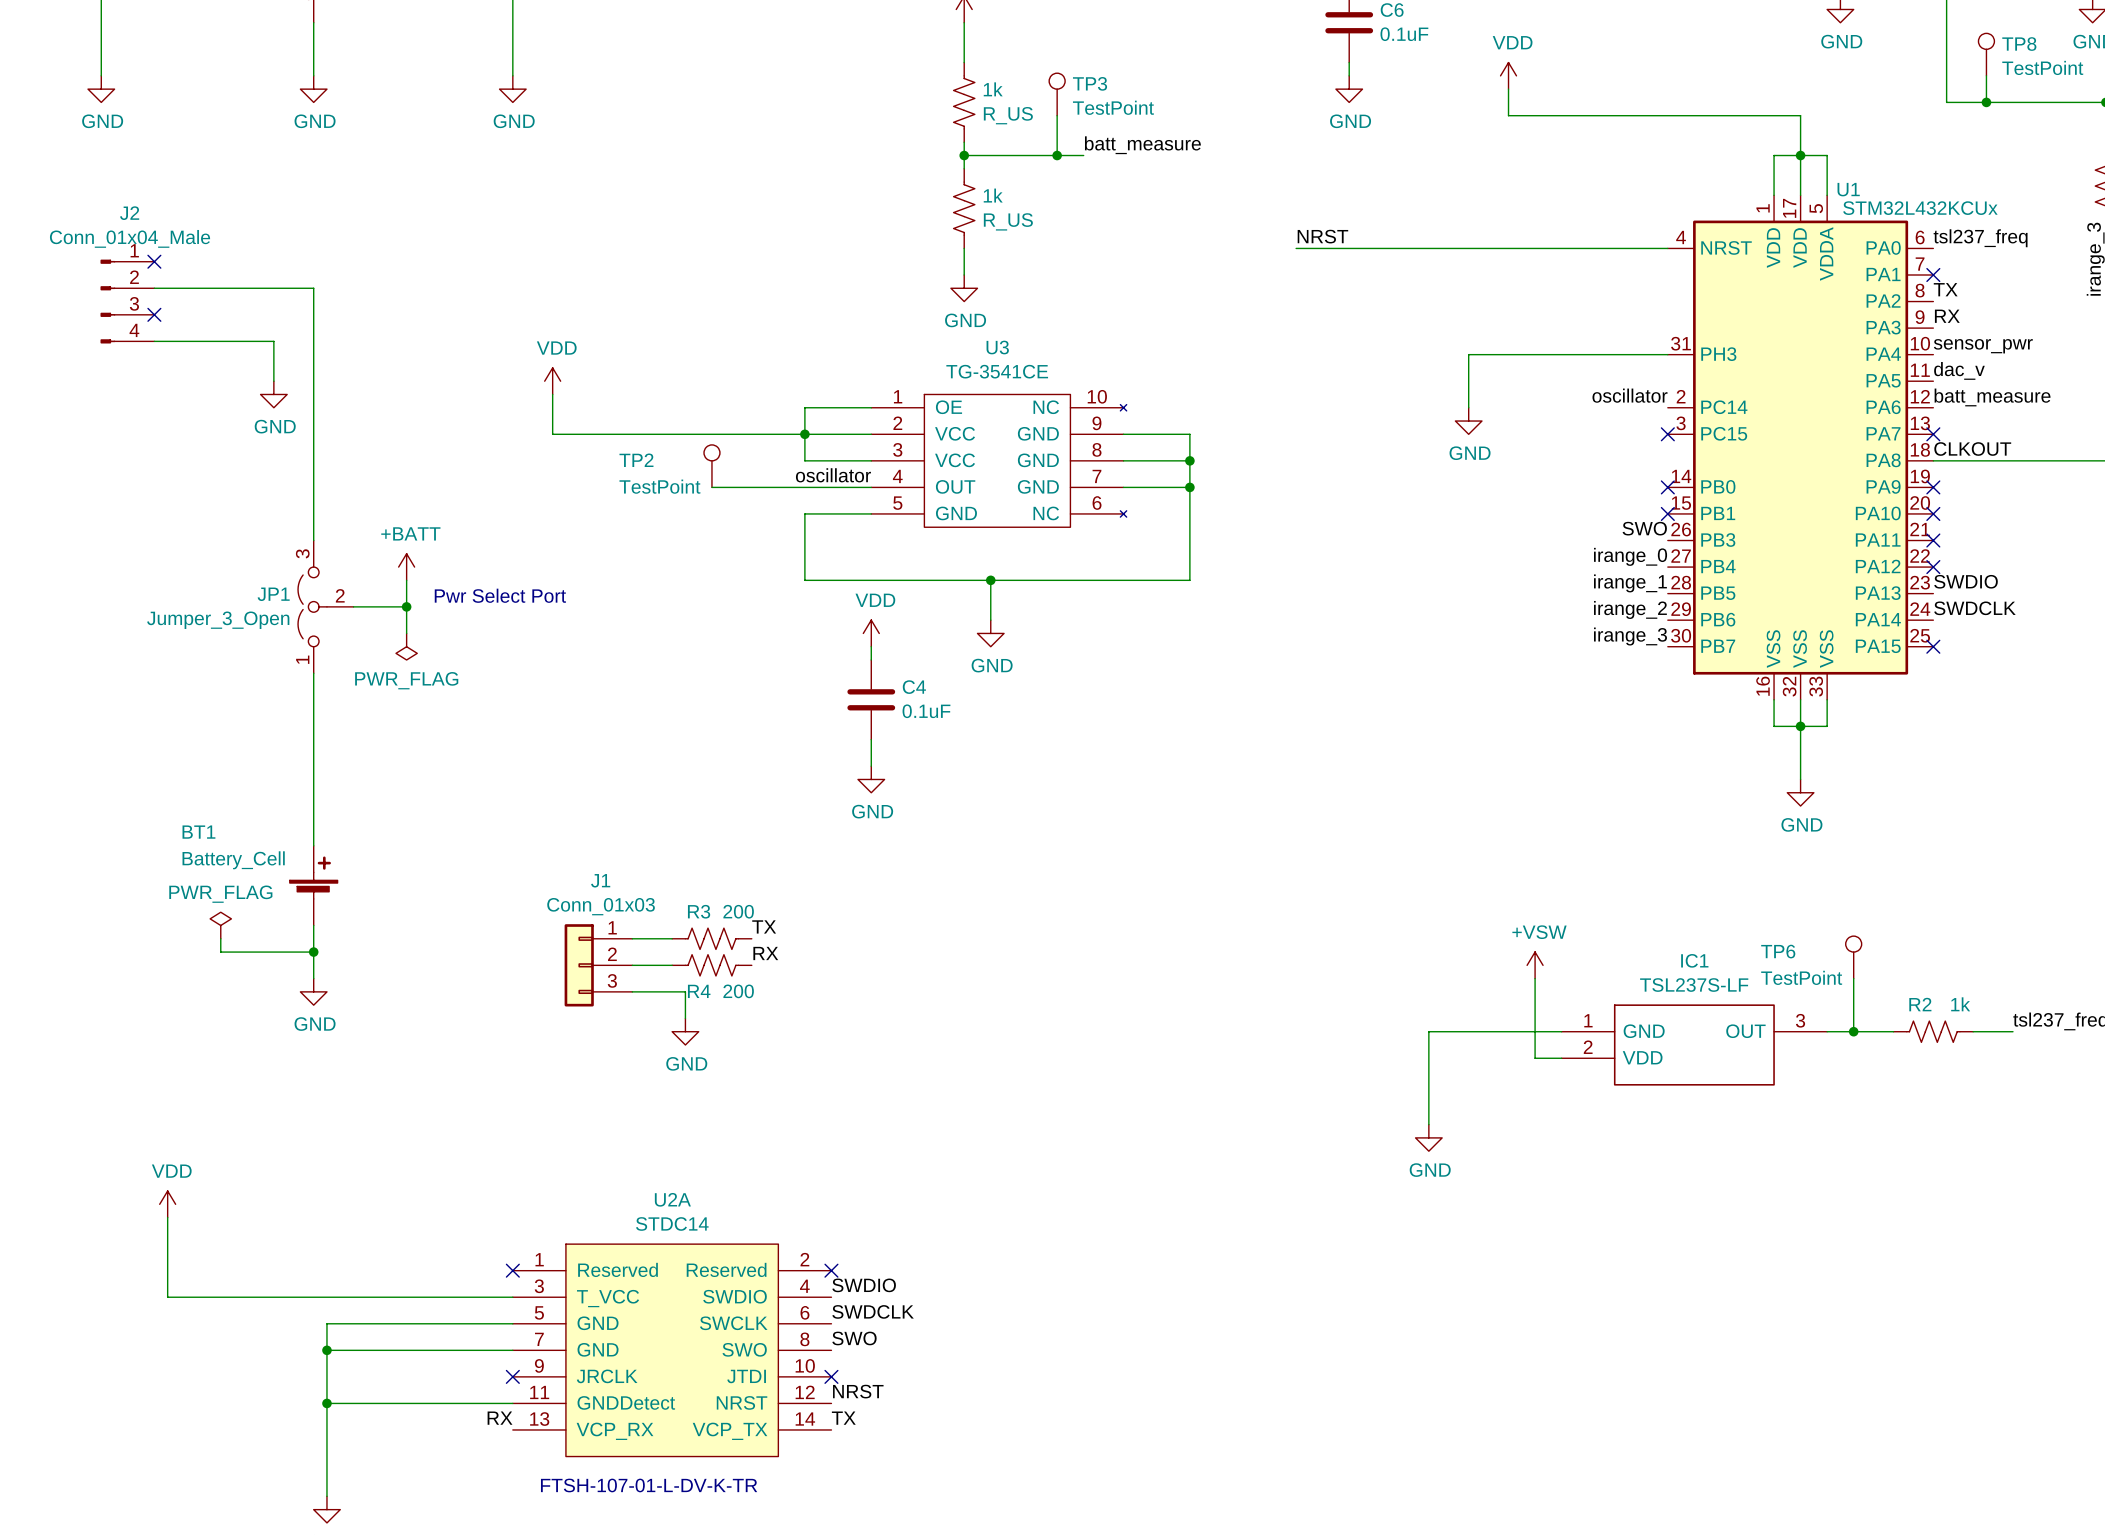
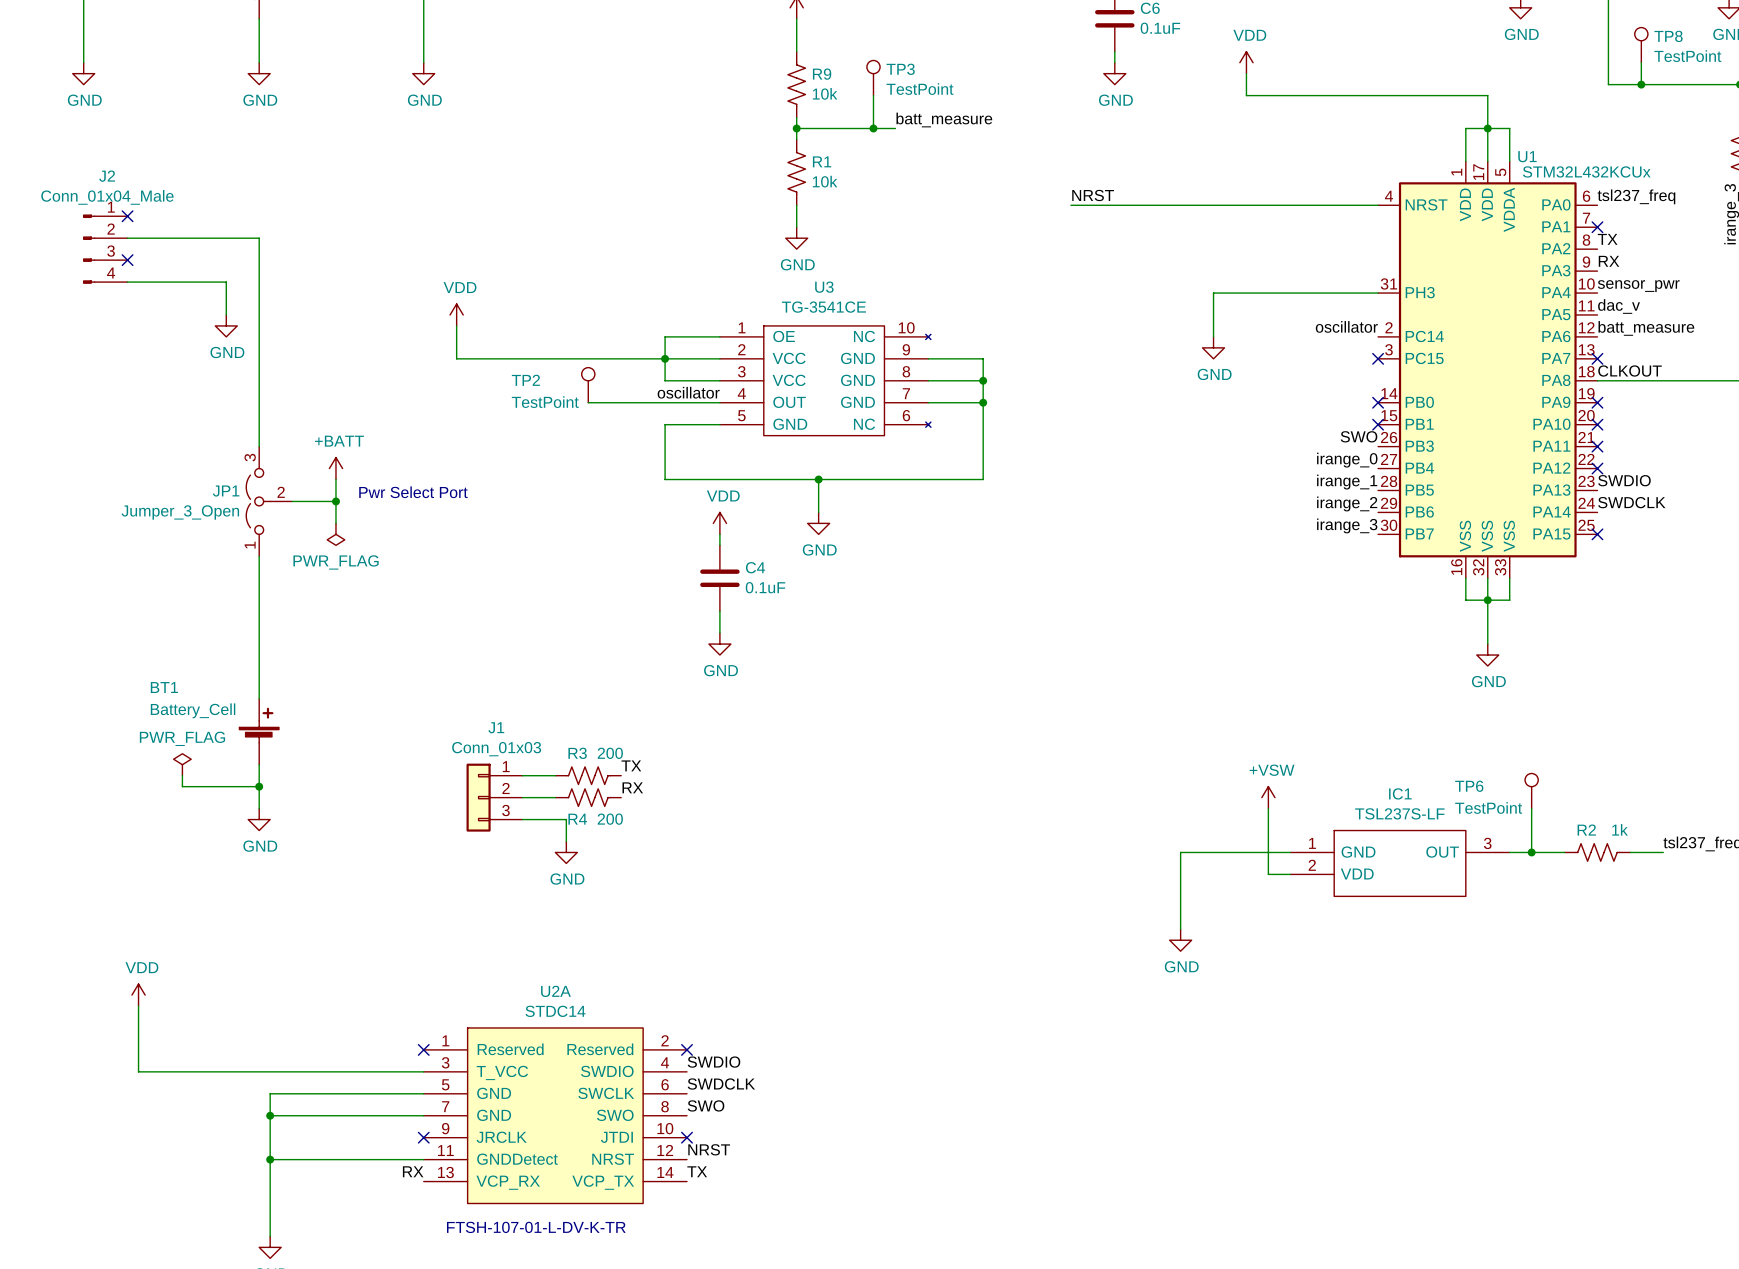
1k name: 1k (993, 89) -> R9 (822, 74)
1k value: R_US (1008, 115) -> 10k (825, 93)
1k name: 1k (993, 195) -> R1 (822, 161)
1k value: R_US (1008, 221) -> 10k (825, 181)

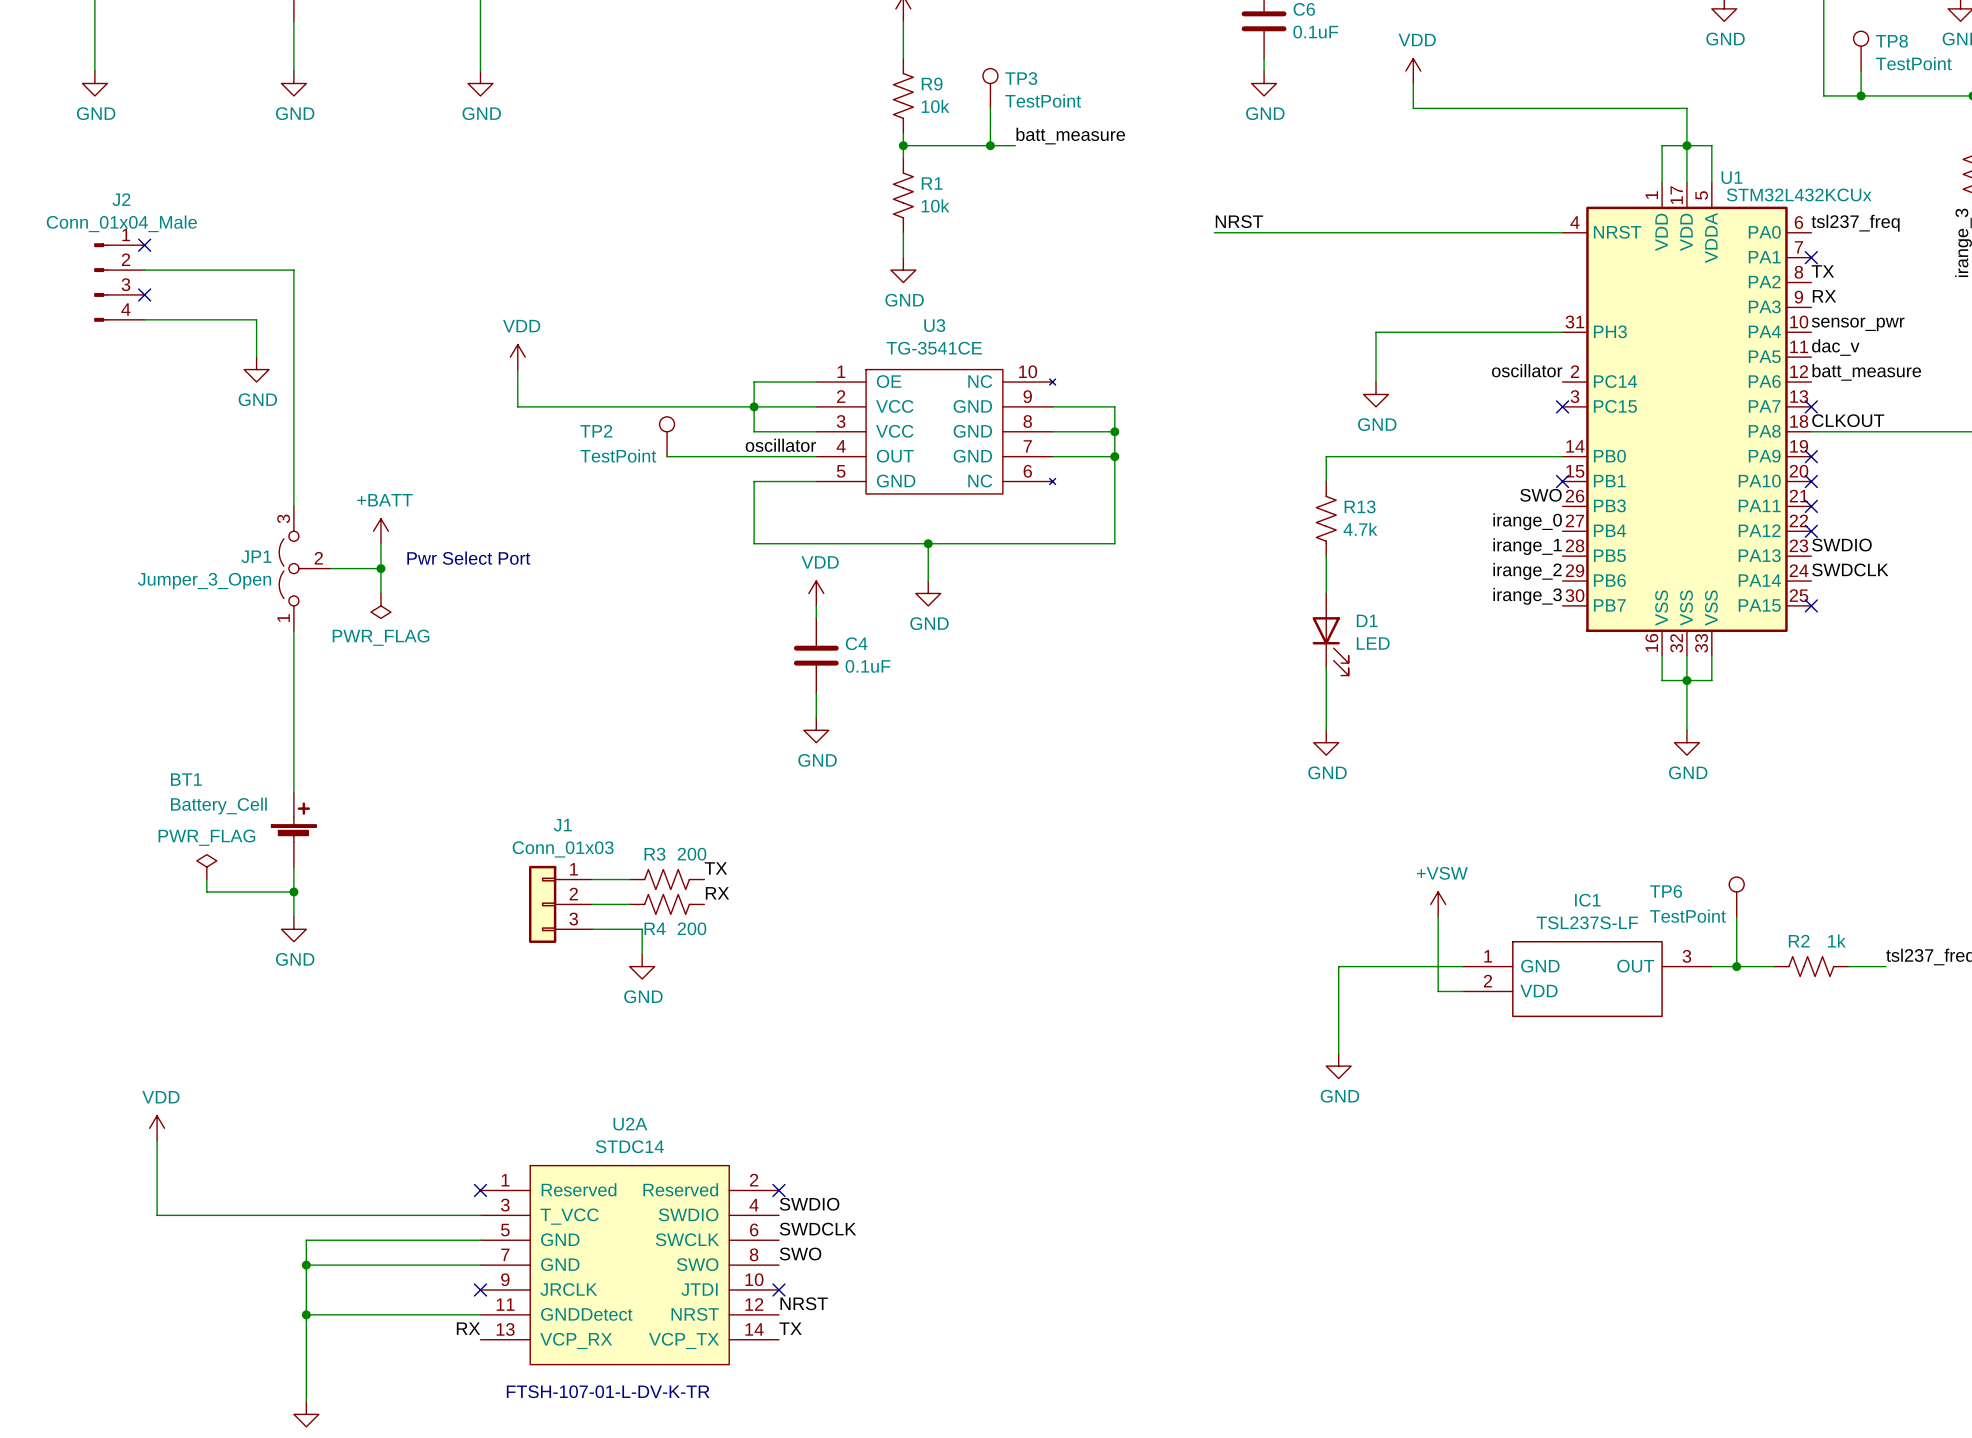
wire: none -> (1562, 456) (1326, 456) (1326, 481)
no-connect mark: (1378, 402) -> none
R13: none -> 4.7k (1326, 518)
wire: none -> (1326, 556) (1326, 593)
D1: none -> LED (1330, 634)
wire: none -> (1326, 668) (1326, 730)
power symbol: none -> GND (1326, 742)

